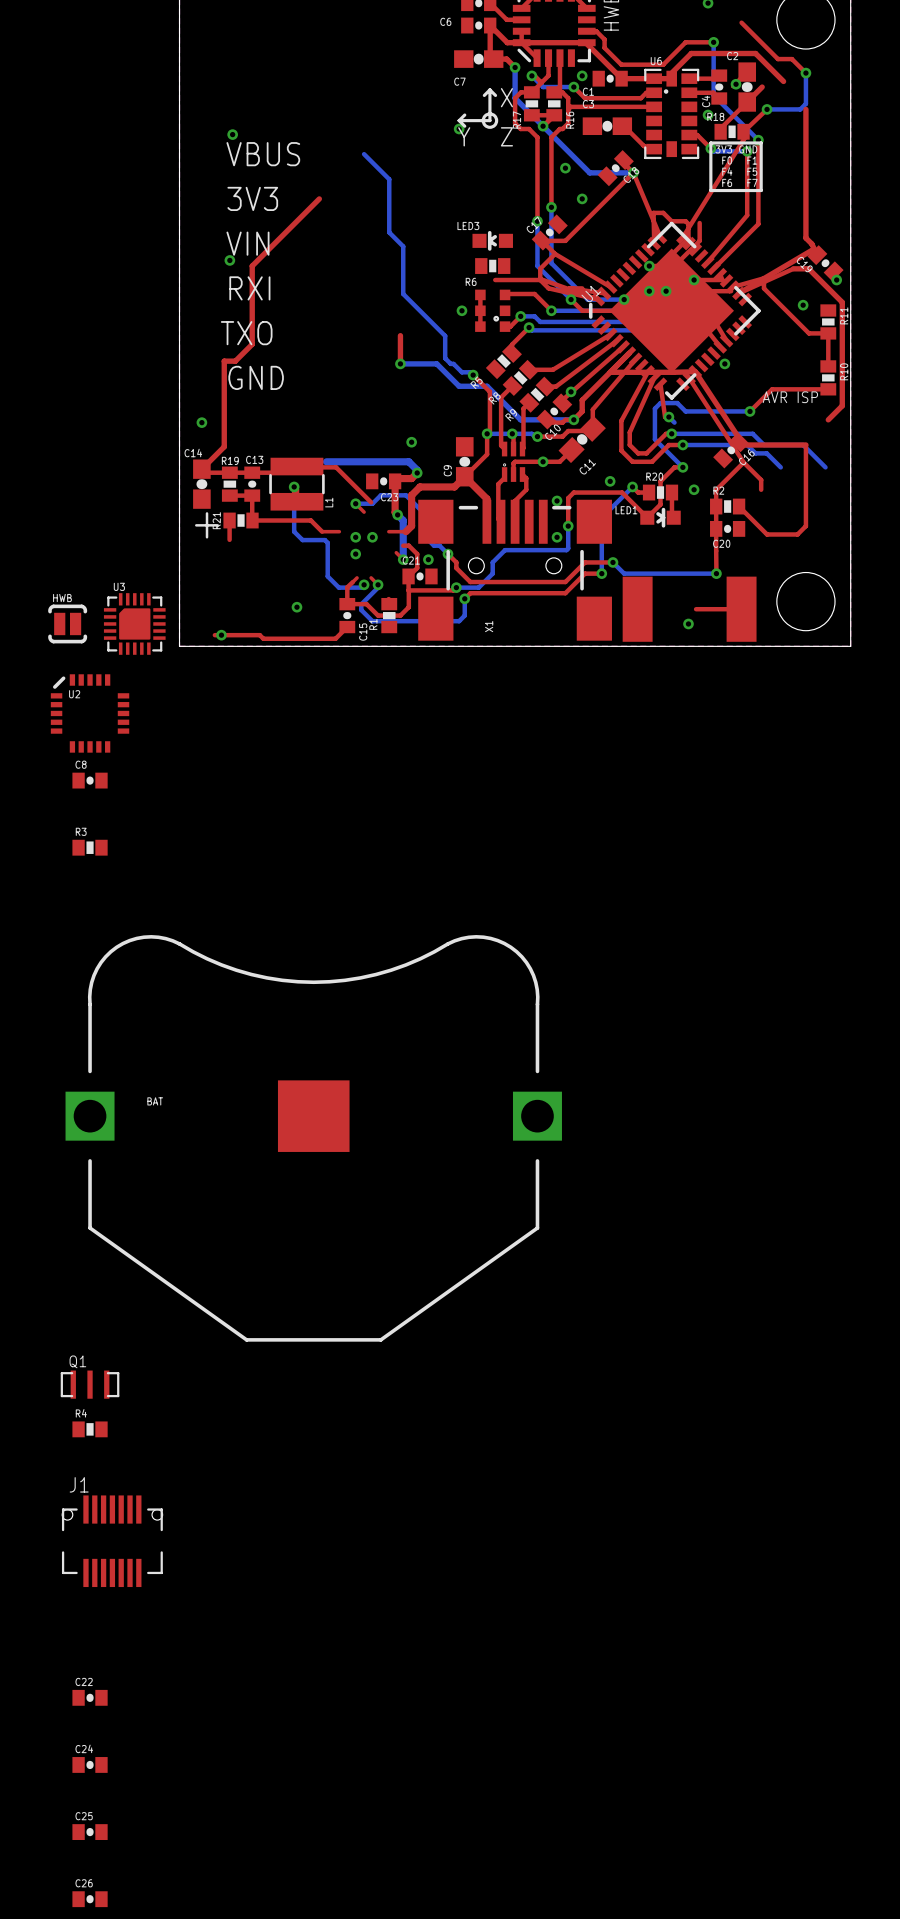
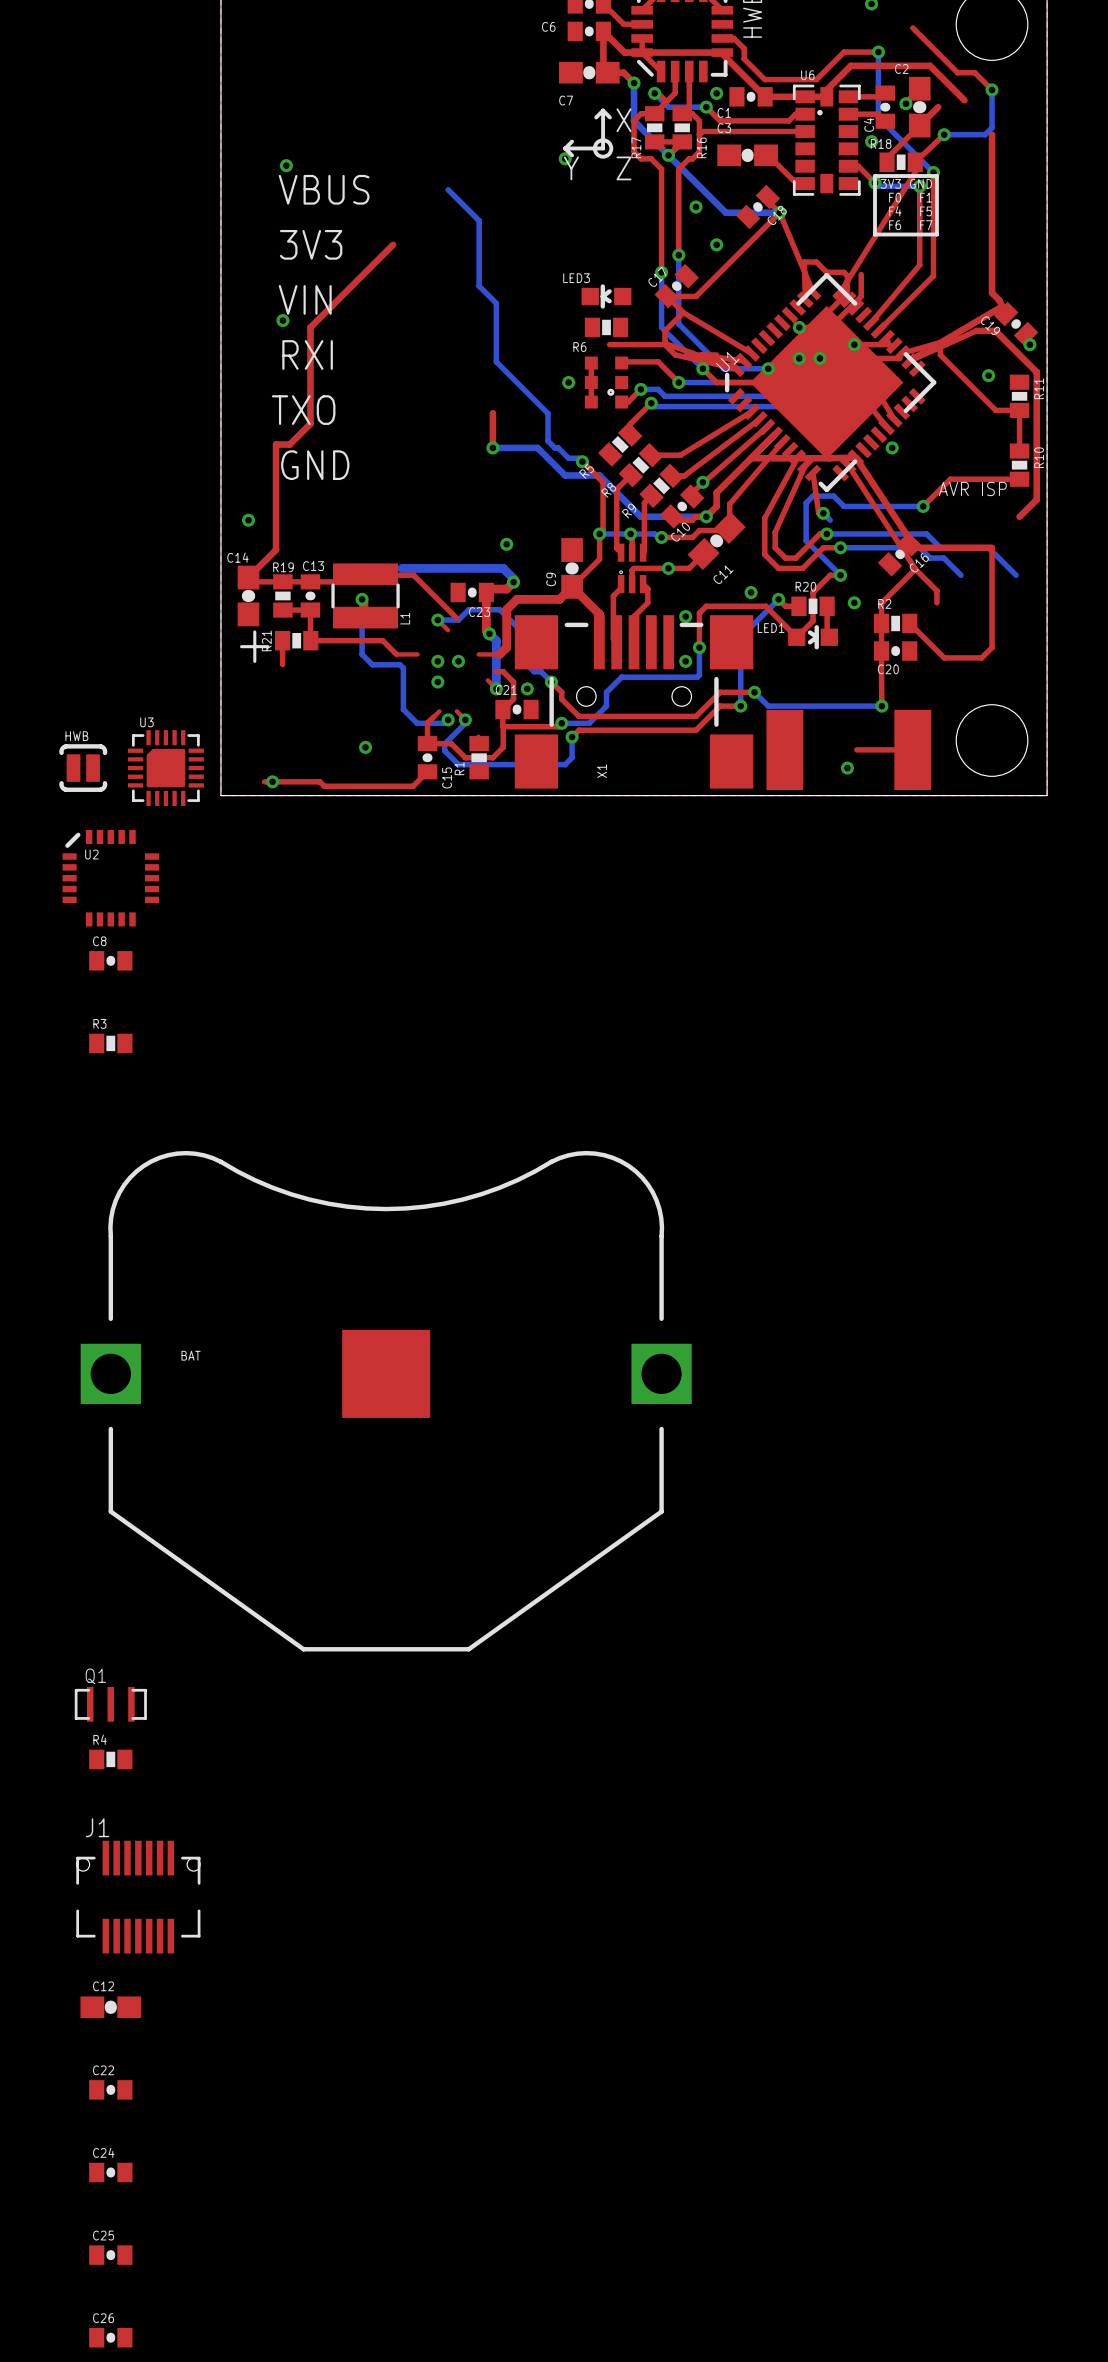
C12: none -> (110, 2007)

